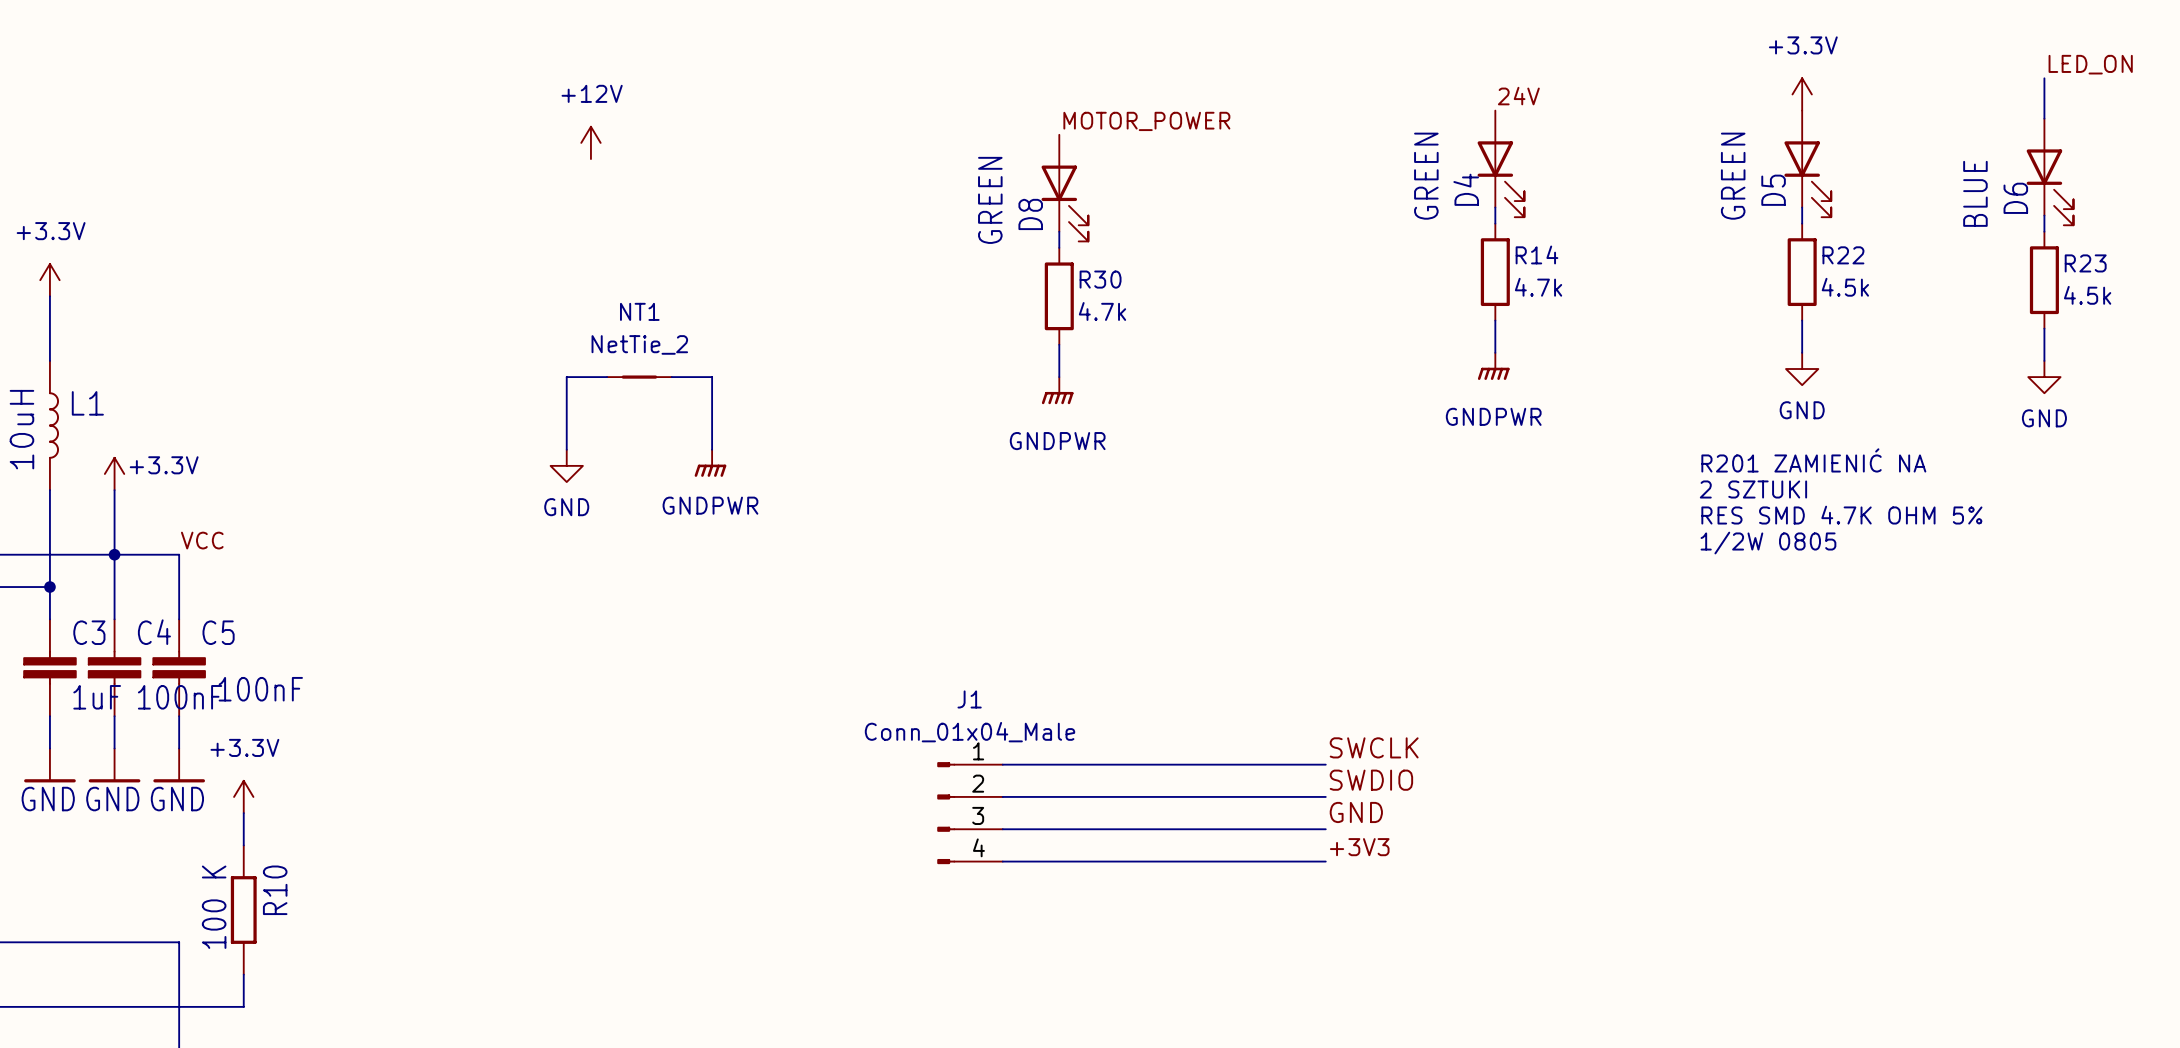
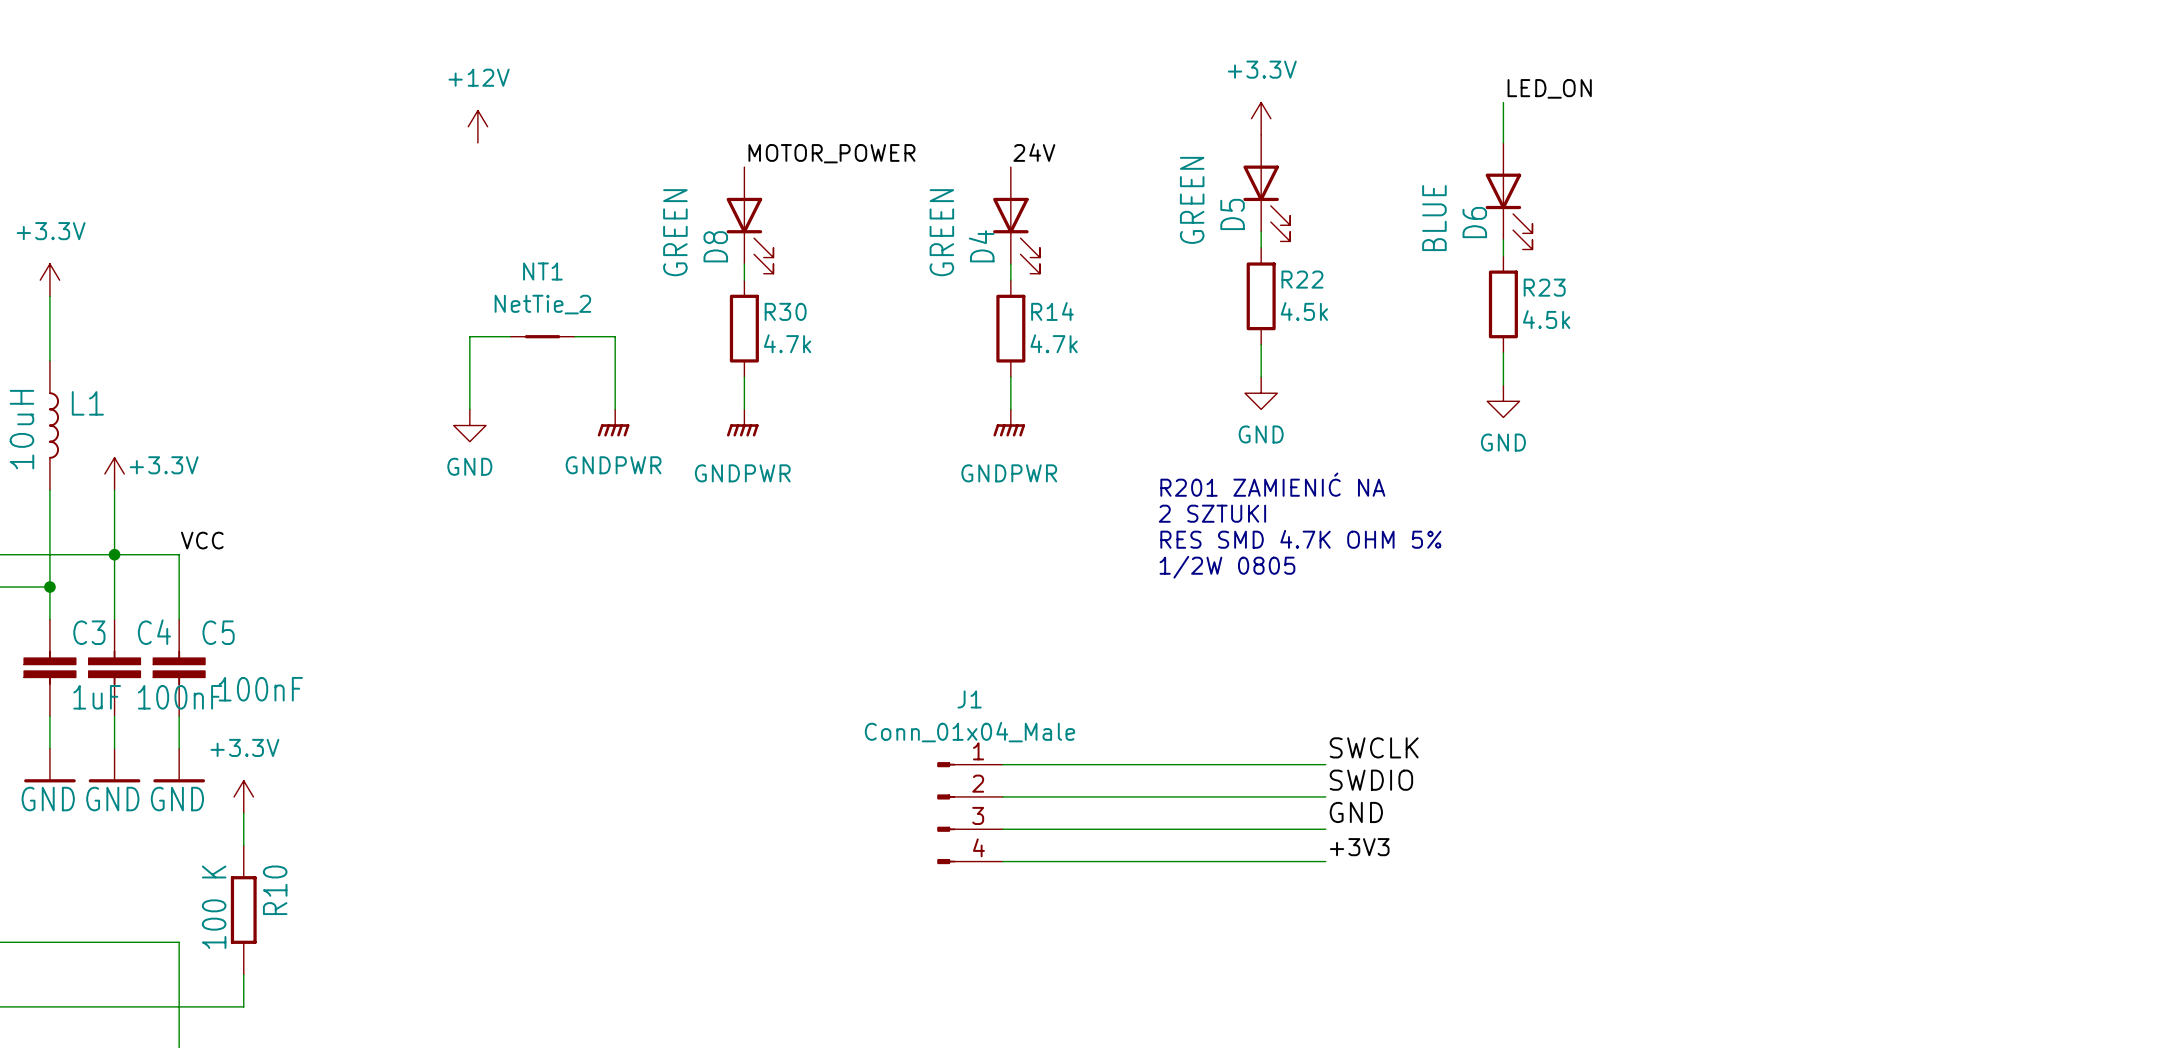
label: LED_ON (2090, 64) -> none
wire: (2044, 78) (2044, 118) -> none
power symbol: +3.3V (1802, 94) -> none
label: 24V (1518, 96) -> LED_ON (1549, 88)
wire: none -> (1503, 102) (1503, 142)
power symbol: none -> +3.3V (1261, 118)
label position: MOTOR_POWER (1146, 121) -> MOTOR_POWER (831, 153)
power symbol position: +12V (590, 142) -> +12V (477, 126)
label: none -> 24V (1034, 152)
D4 position: (1500, 163) -> (1016, 220)
D5 position: (1807, 163) -> (1266, 188)
D6 position: (2050, 171) -> (1509, 196)
D8 position: (1064, 188) -> (750, 220)
wire: (1495, 207) (1495, 223) -> (1503, 239) (1503, 255)
wire: (1802, 207) (1802, 223) -> none
wire: (2044, 215) (2044, 231) -> none
wire: (1059, 231) (1059, 247) -> (1010, 264) (1010, 280)
wire: none -> (1261, 231) (1261, 247)
wire: none -> (744, 264) (744, 280)
R14 position: (1495, 272) -> (1010, 328)
R22 position: (1802, 272) -> (1261, 296)
R23 position: (2044, 280) -> (1503, 304)
R30 position: (1059, 296) -> (744, 328)
wire: (1495, 320) (1495, 352) -> (1503, 352) (1503, 385)
wire: (1802, 320) (1802, 352) -> none
wire: (2044, 328) (2044, 360) -> none
wire: (1059, 344) (1059, 377) -> (1010, 377) (1010, 409)
wire: none -> (1261, 344) (1261, 377)
power symbol: GNDPWR (1493, 366) -> none
power symbol: GND (1802, 369) -> none
wire: (607, 377) (566, 377) (566, 449) -> (510, 336) (469, 336) (469, 409)
NT1 position: (639, 377) -> (542, 336)
wire: (671, 377) (712, 377) (712, 449) -> (574, 336) (615, 336) (615, 409)
wire: none -> (744, 377) (744, 409)
power symbol: GND (2044, 377) -> none
power symbol position: GNDPWR (1057, 390) -> GNDPWR (1009, 422)
power symbol: none -> GND (1261, 393)
power symbol: none -> GND (1503, 401)
power symbol: none -> GNDPWR (613, 422)
text: R201 ZAMIENIĆ NA (1813, 460) -> none
power symbol position: GNDPWR (710, 463) -> GNDPWR (742, 422)
power symbol position: GND (566, 465) -> GND (469, 425)
text: none -> R201 ZAMIENIĆ NA (1272, 484)
text: 2 SZTUKI (1753, 489) -> none
power symbol text position: GNDPWR (710, 505) -> GNDPWR (742, 473)
text: none -> 2 SZTUKI (1212, 513)
text: RES SMD 4.7K OHM 5% (1841, 515) -> none
text: none -> RES SMD 4.7K OHM 5% (1300, 539)
text: 1/2W 0805 (1768, 543) -> none
text: none -> 1/2W 0805 (1227, 567)

